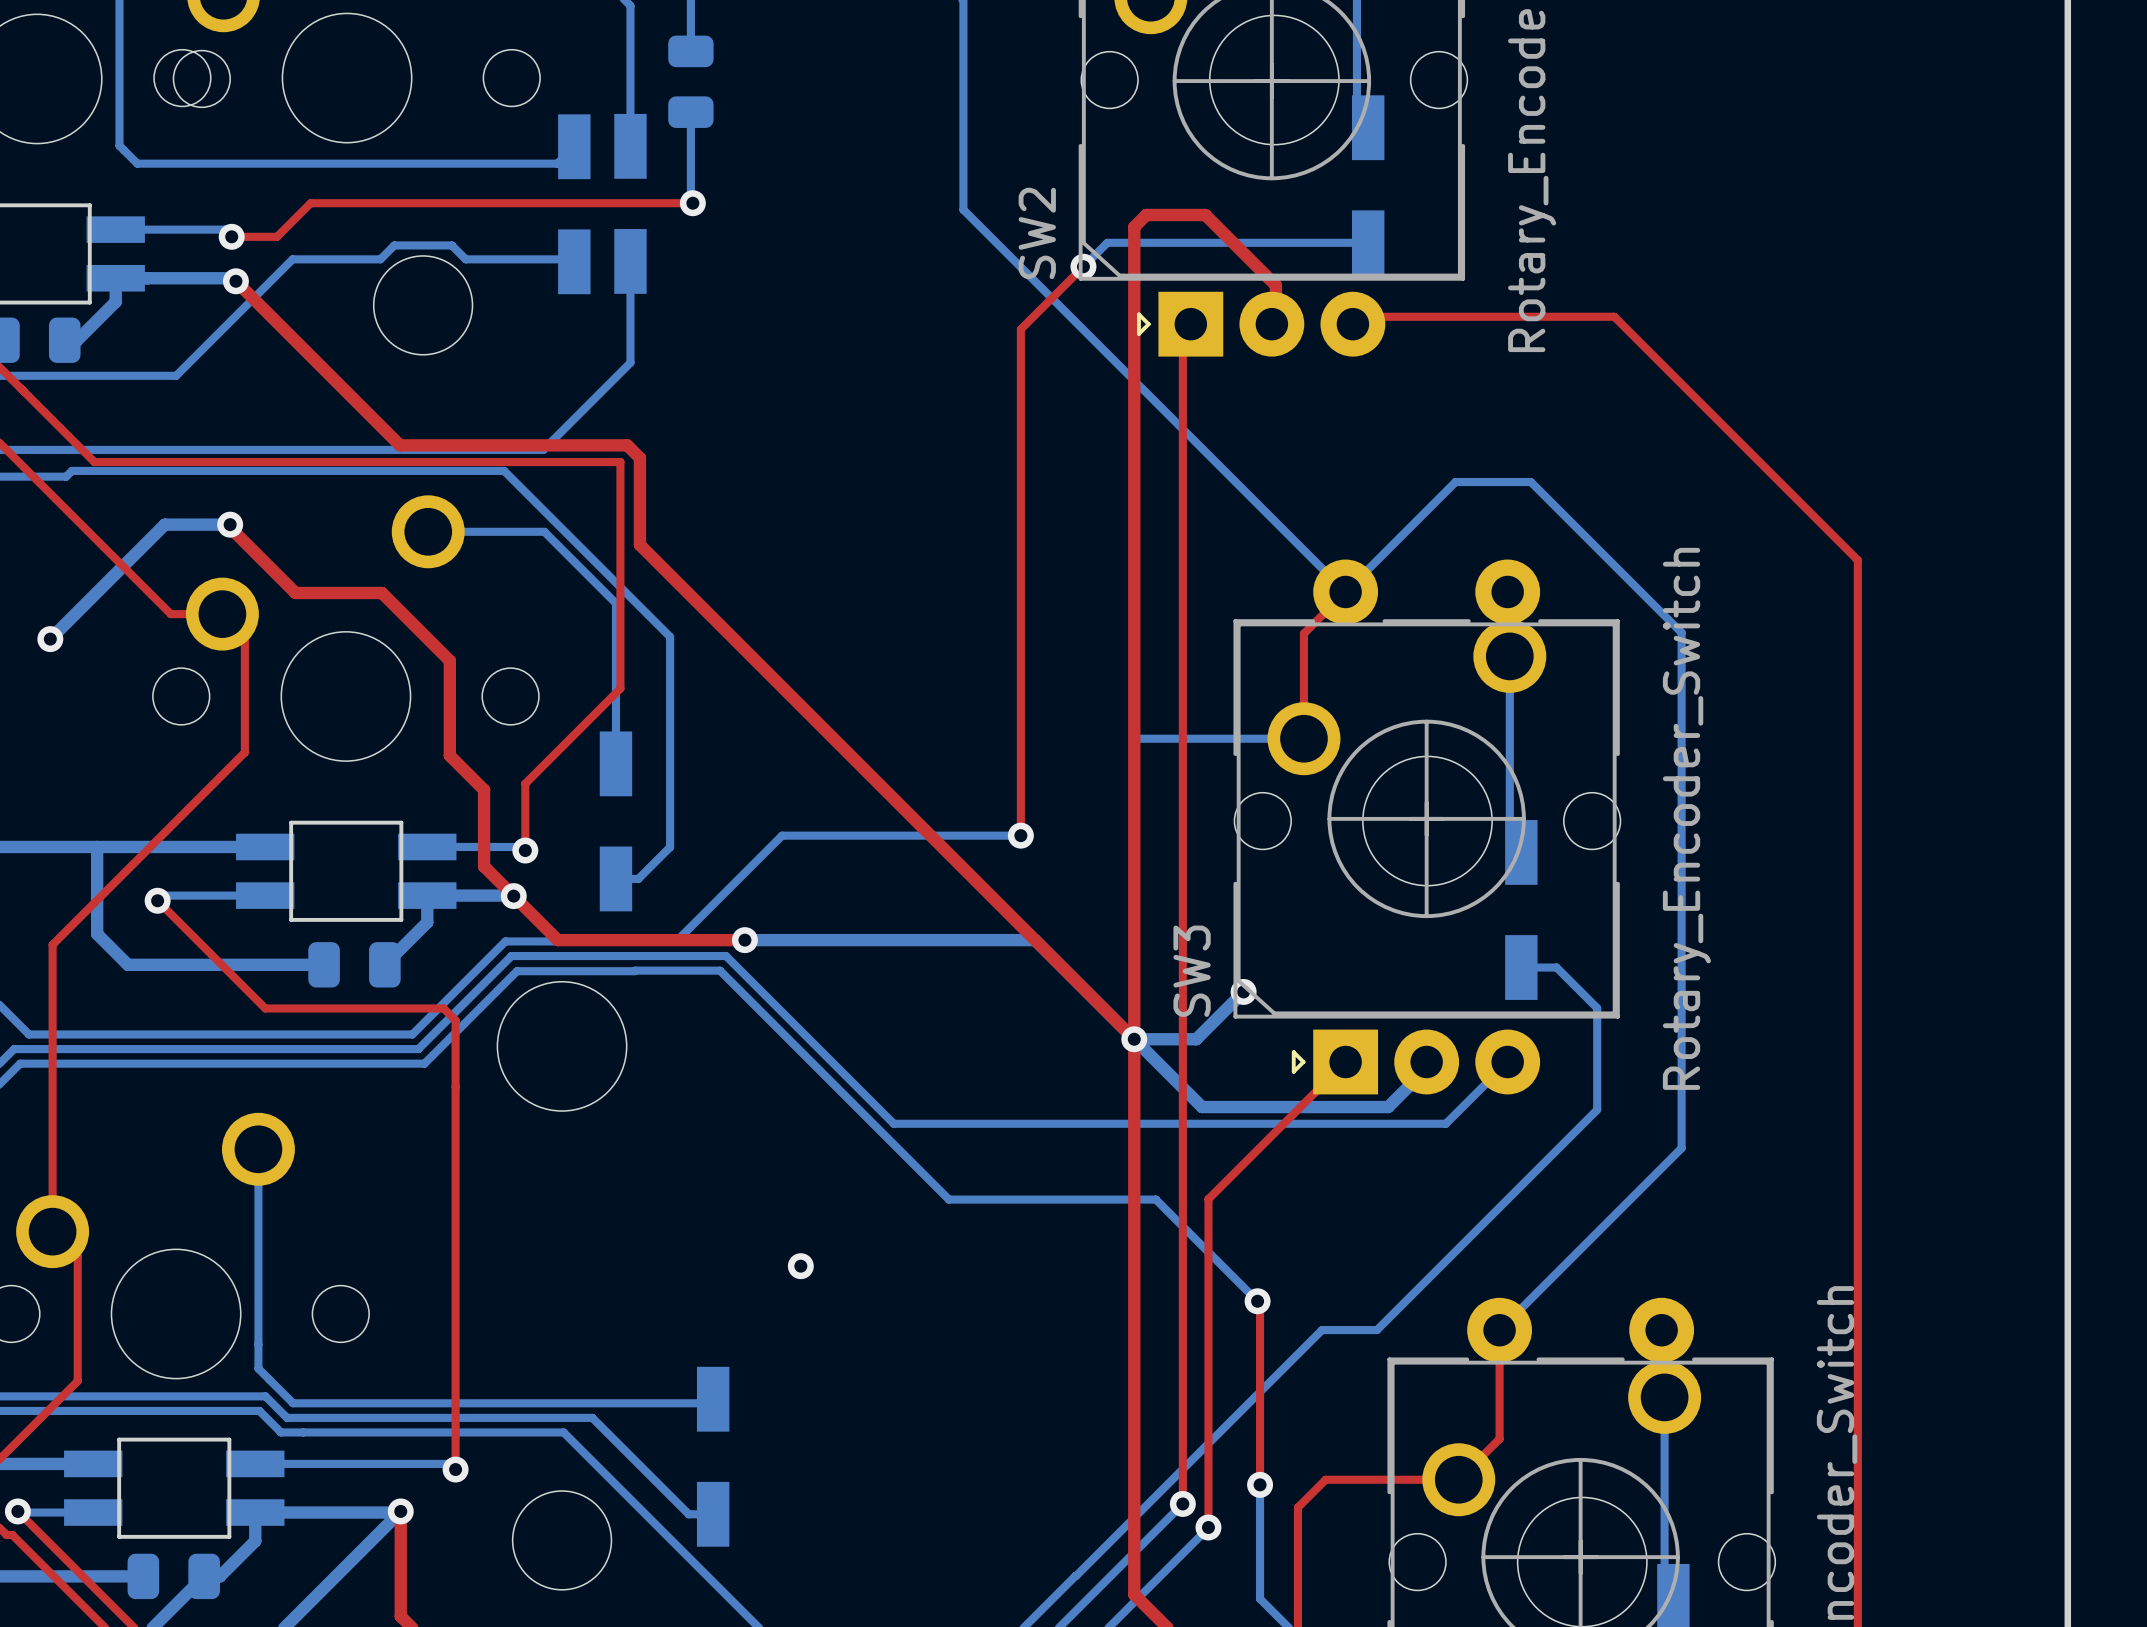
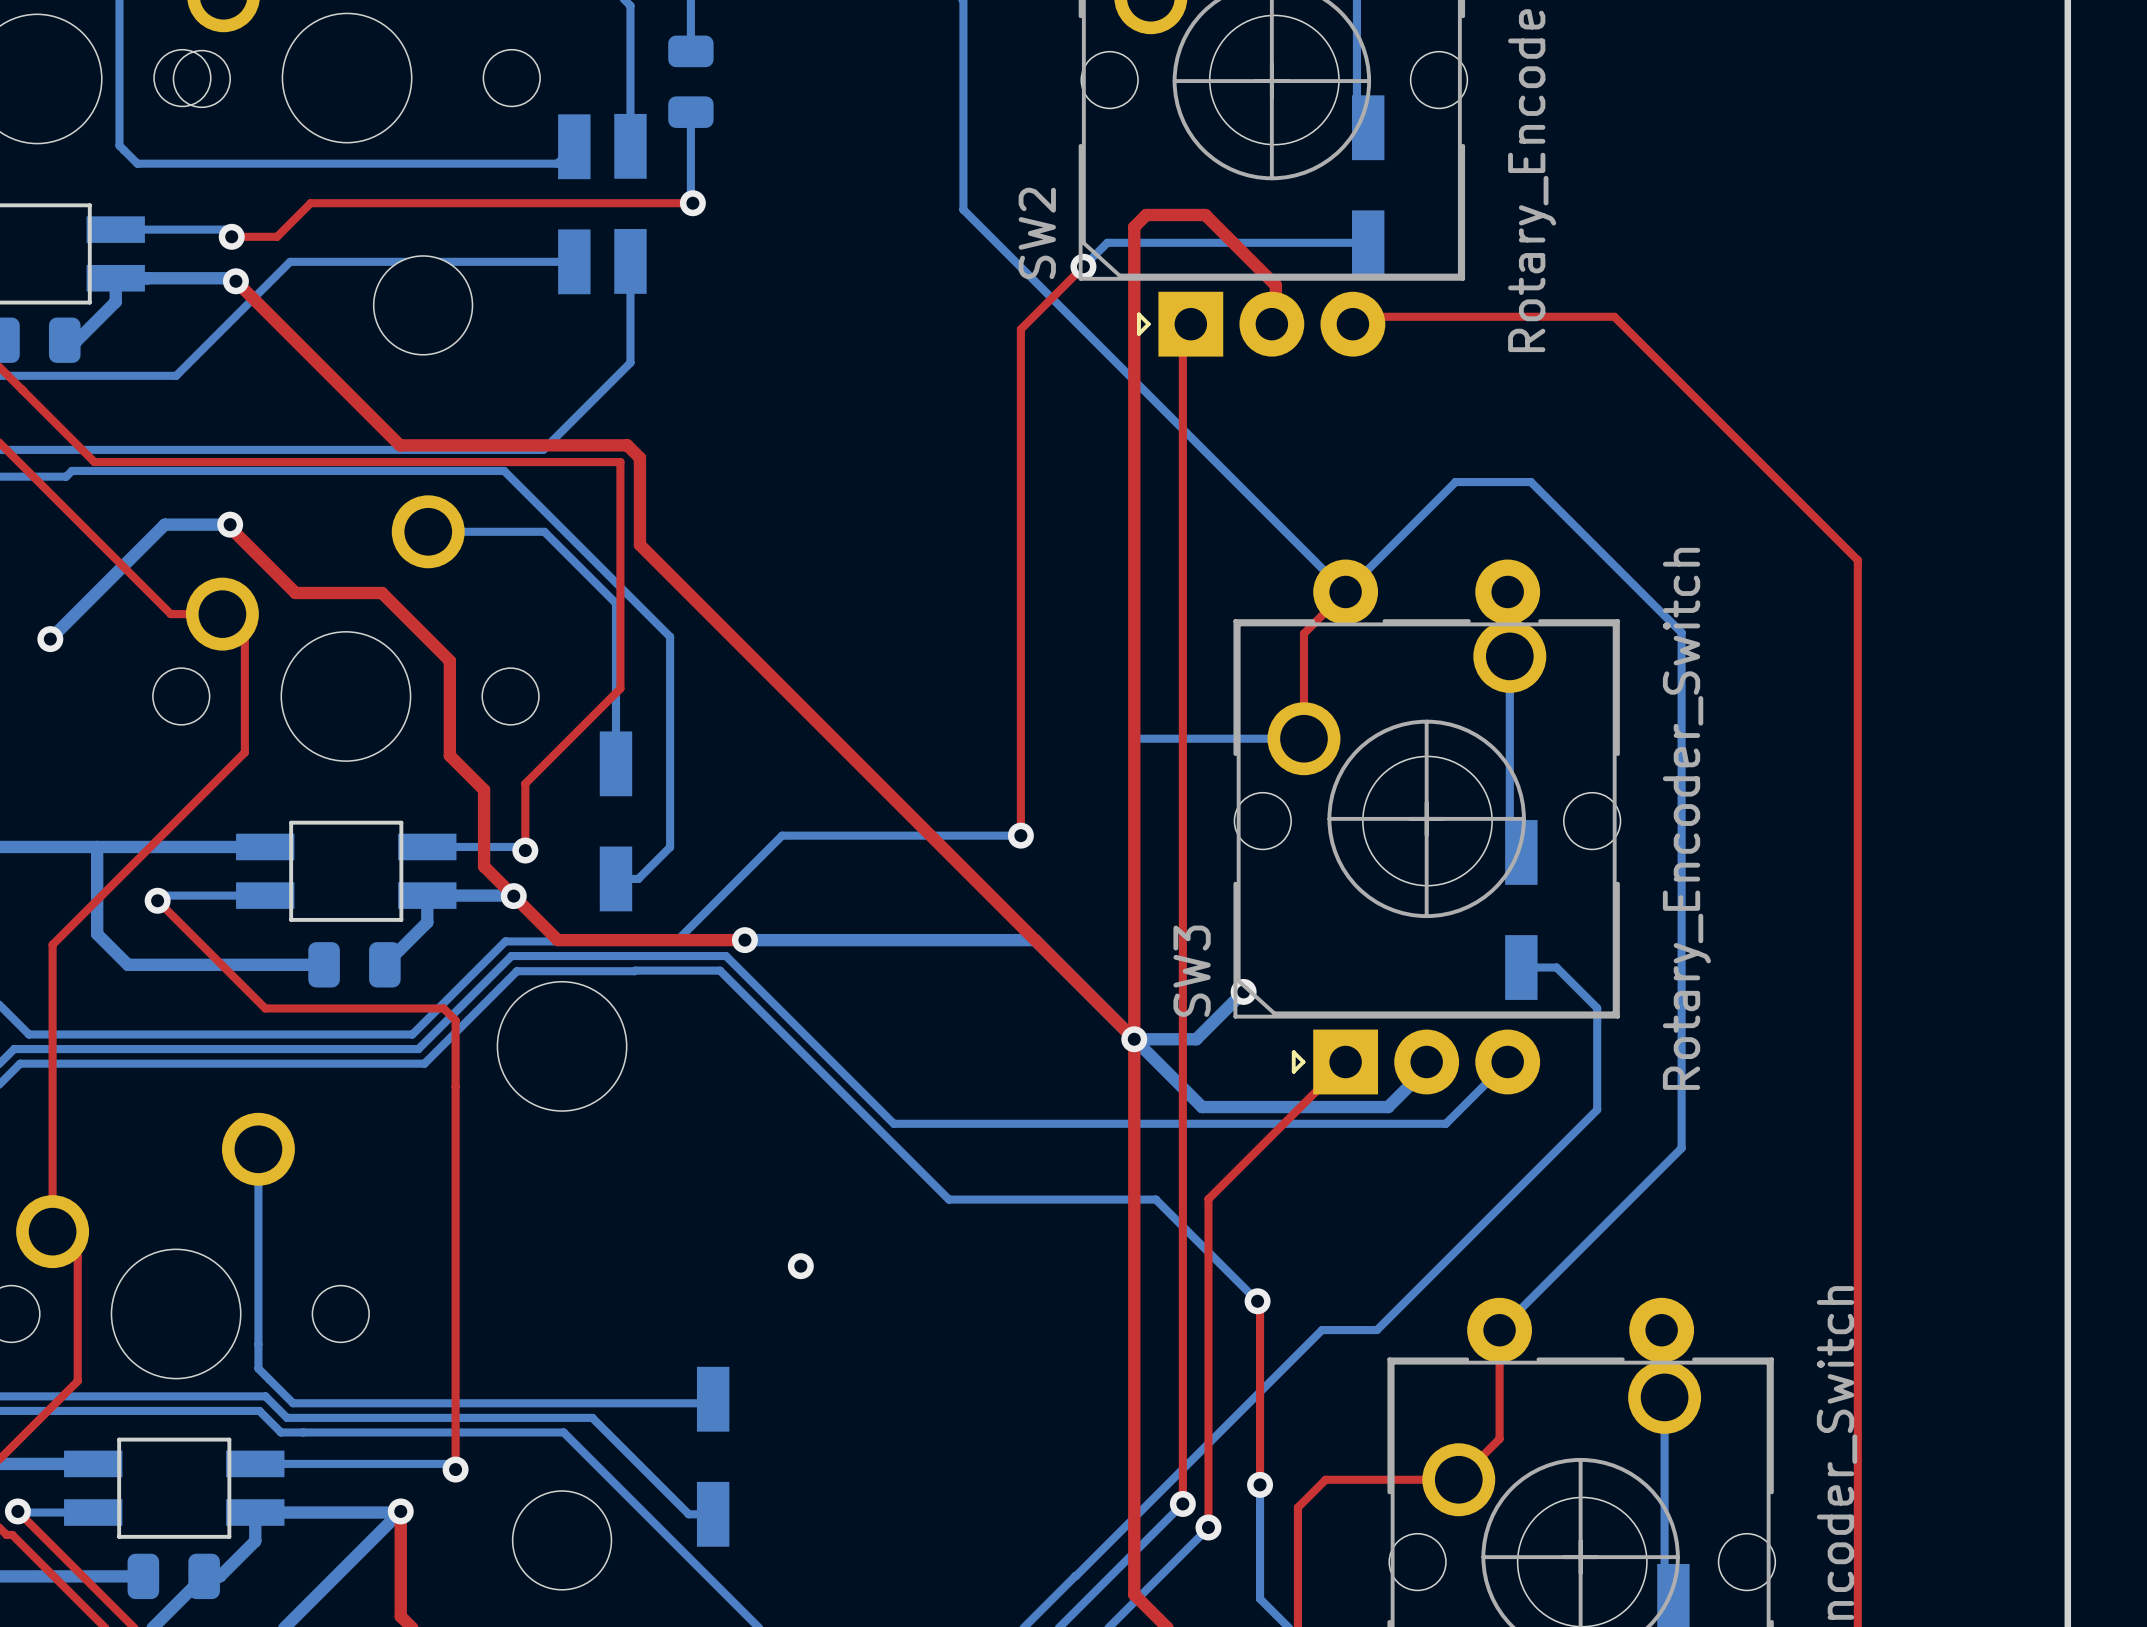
bottom track: (290, 261) (292, 259) (380, 259) (394, 245) (451, 245) (465, 259) (571, 259) (574, 261) -> (290, 261) (574, 261)

